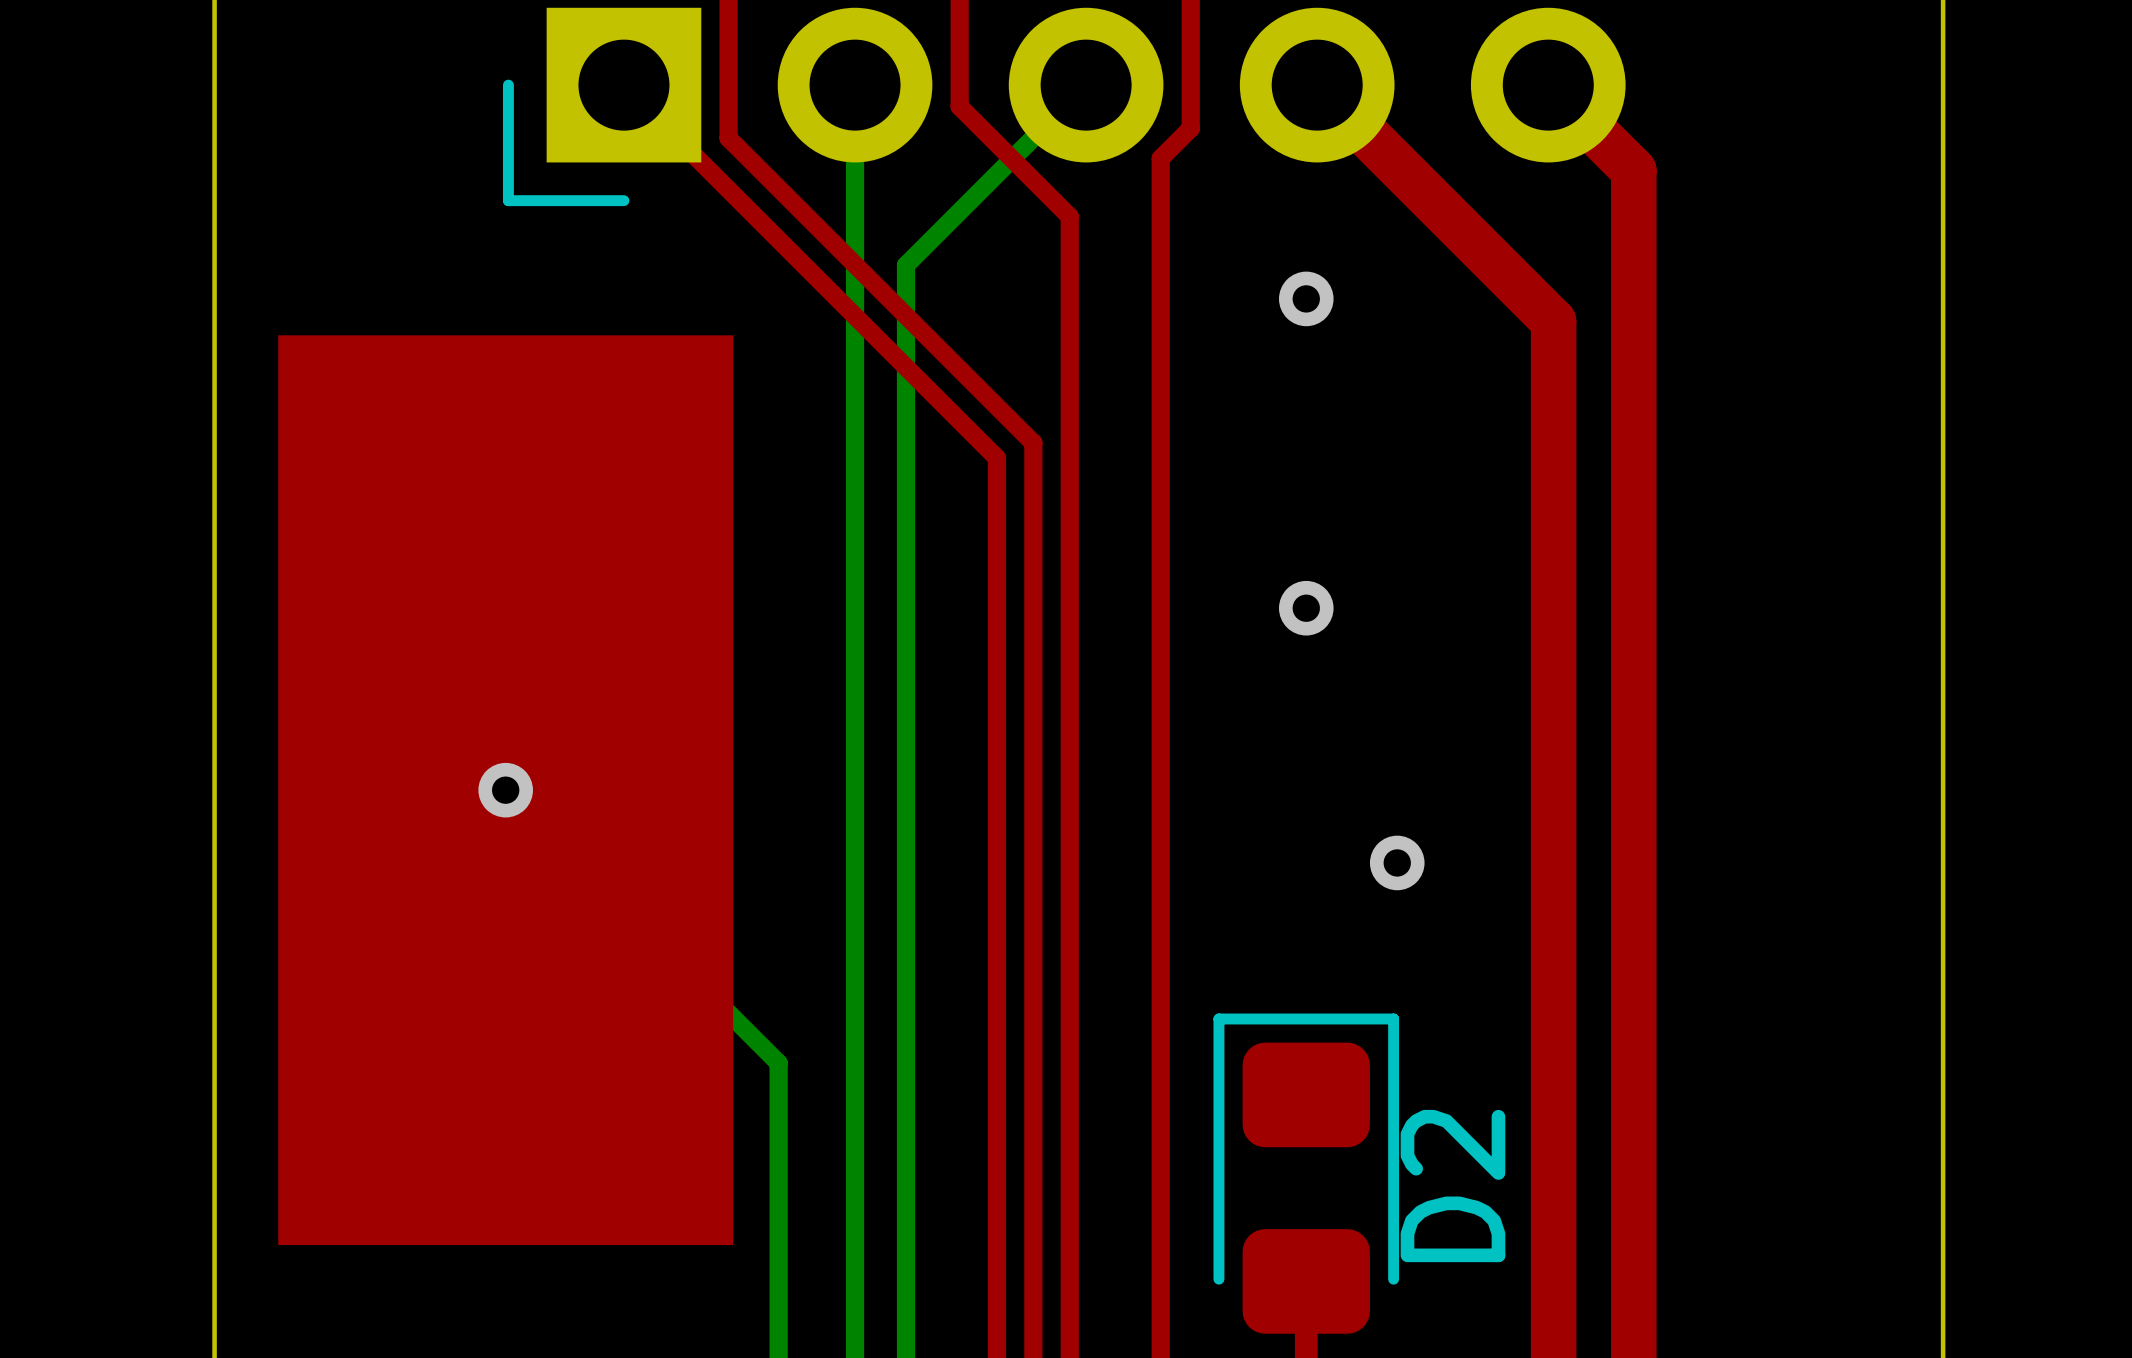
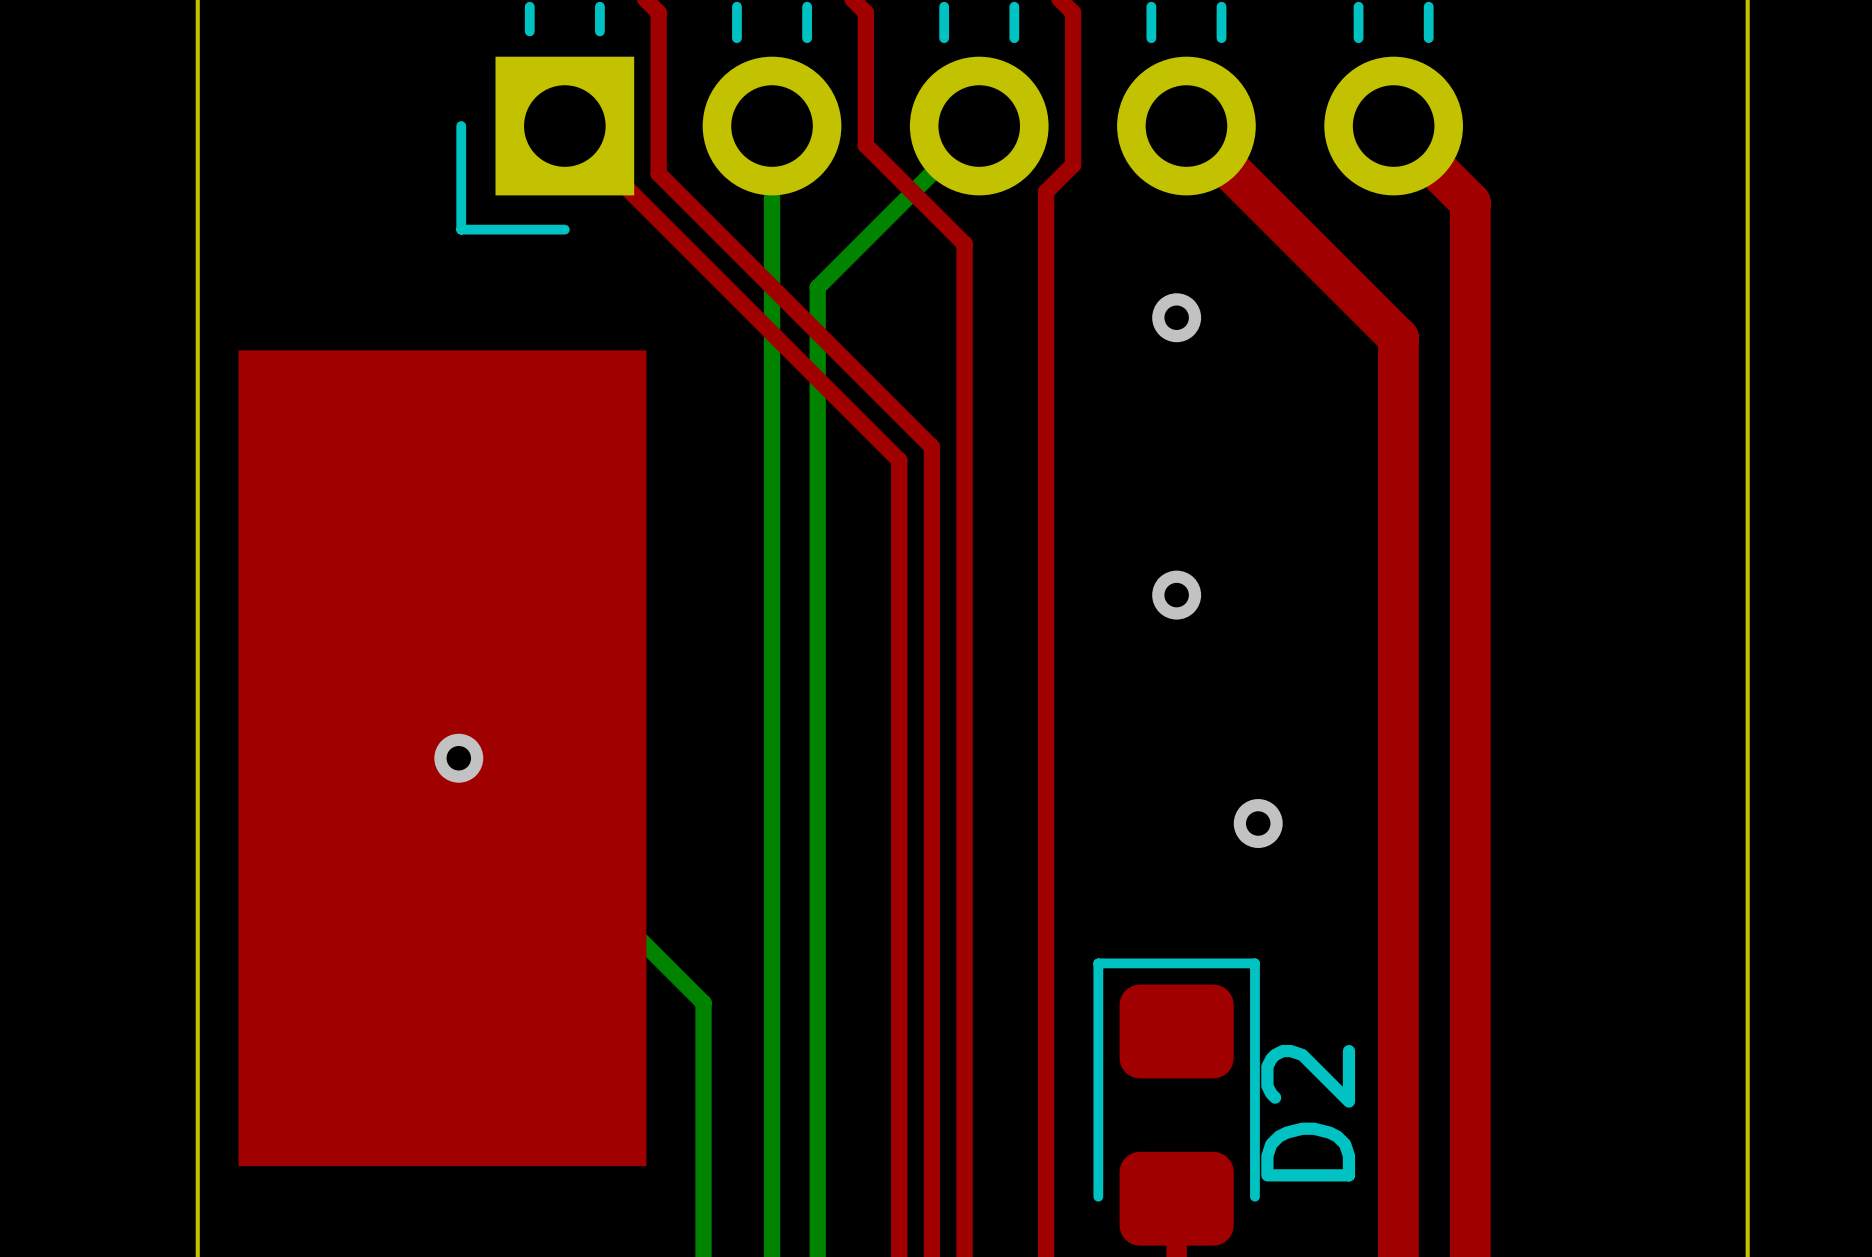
part position: (505, 790) -> (442, 758)

